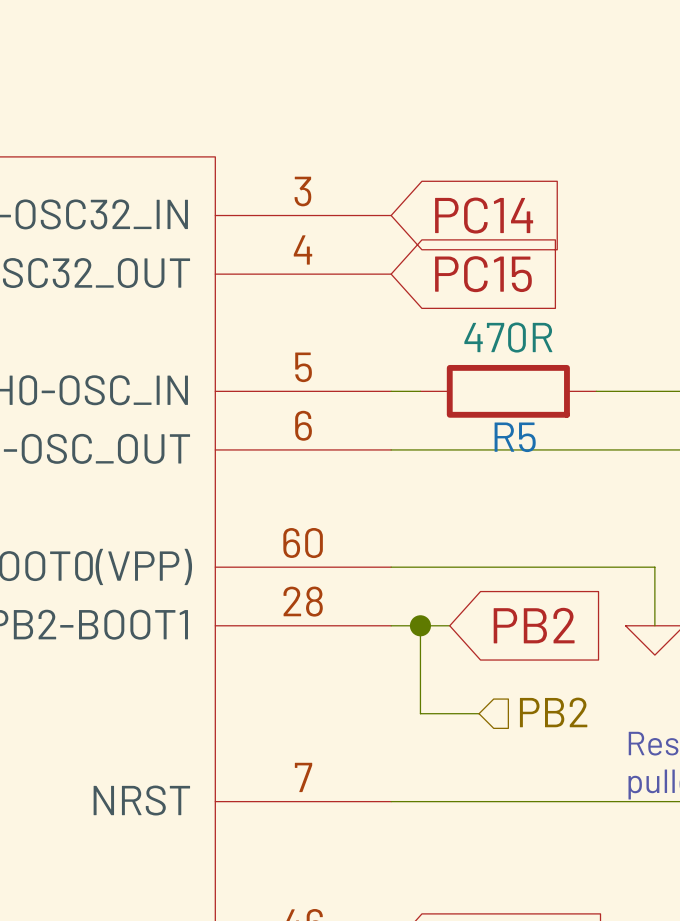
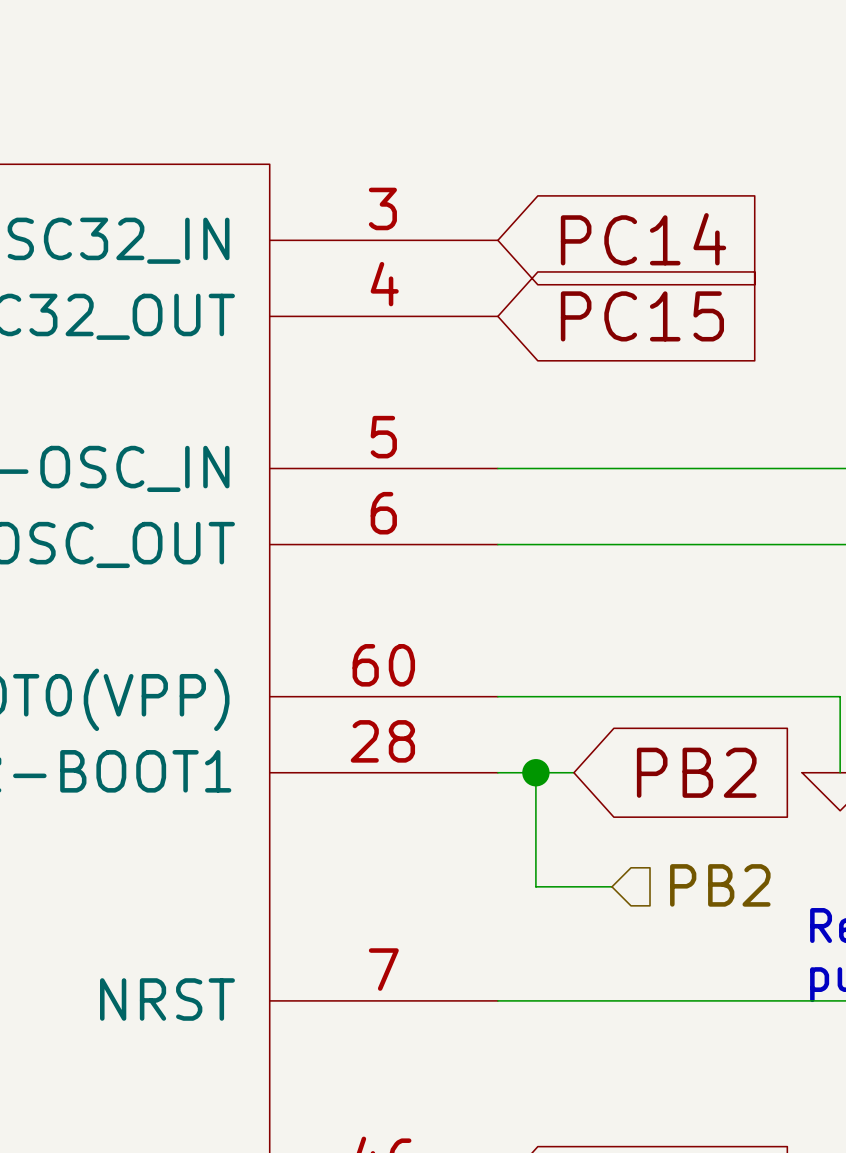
wire: none -> (535, 468) (764, 468)
R5: 470R (508, 391) -> none

